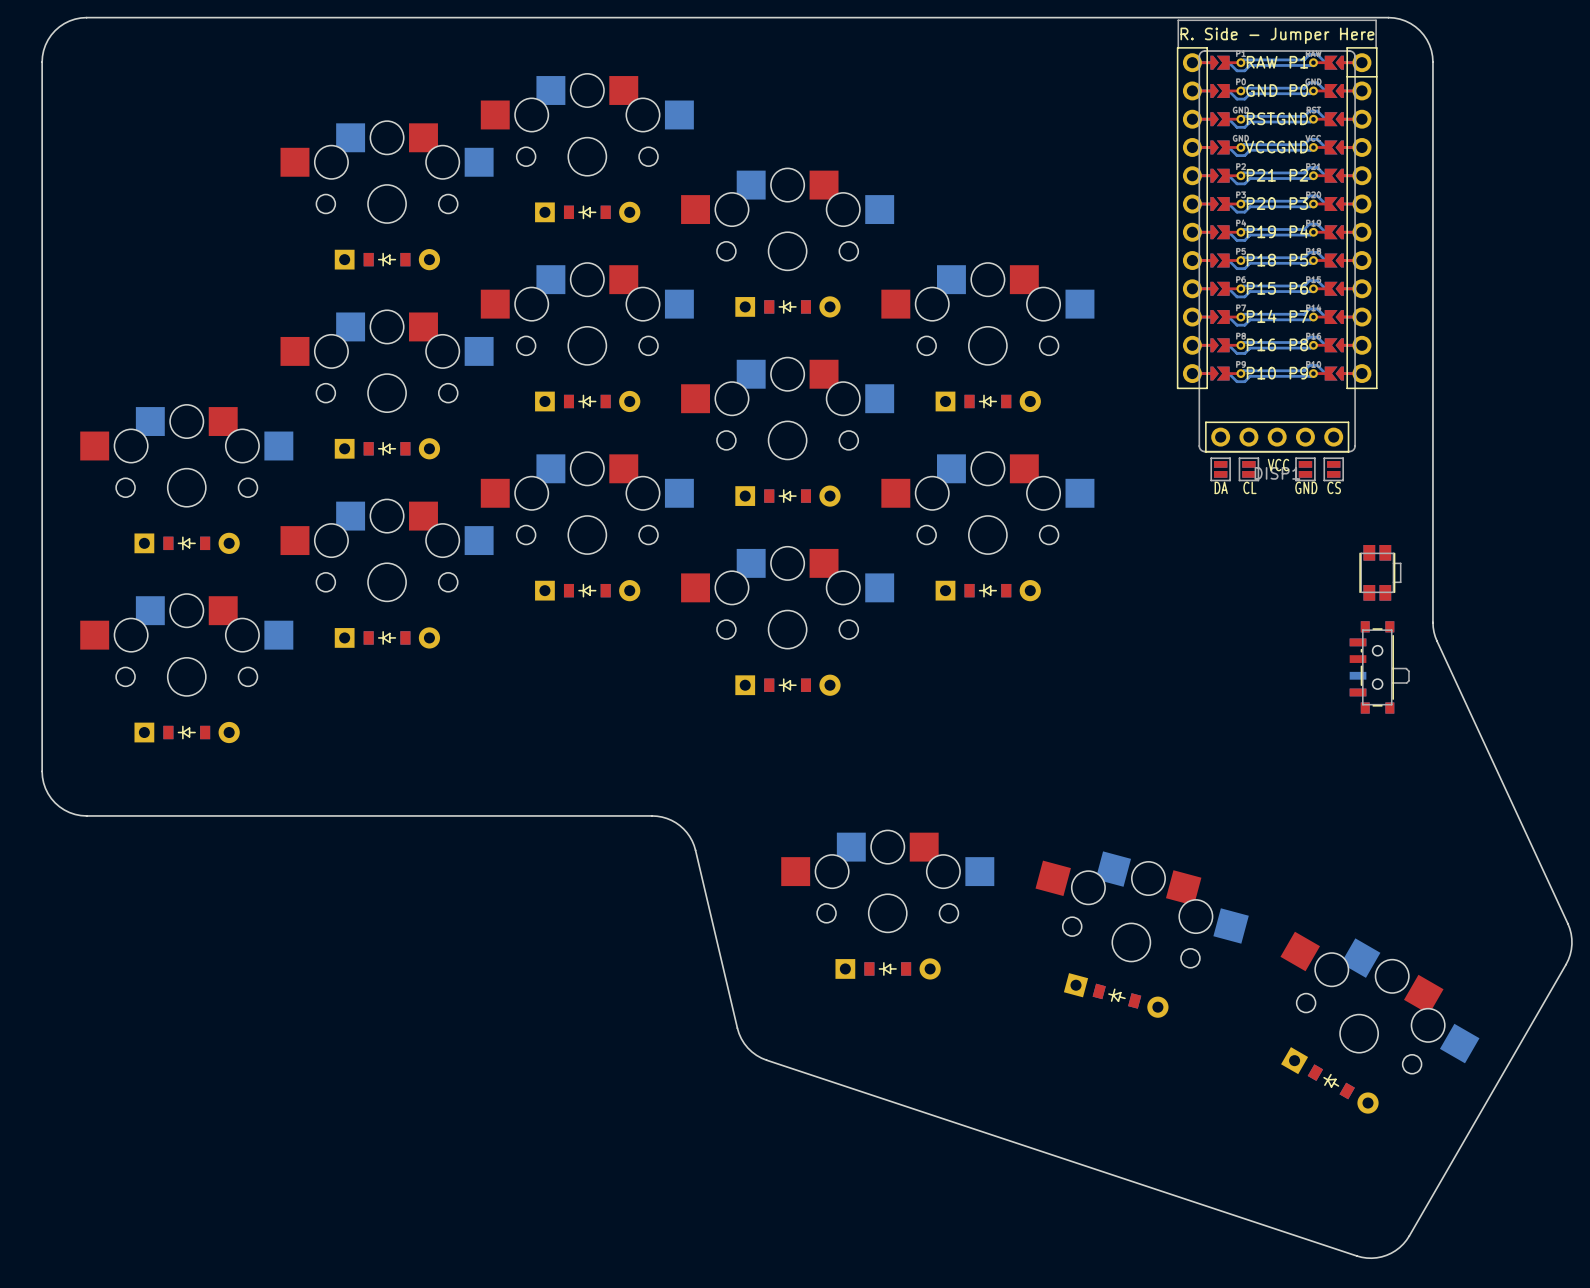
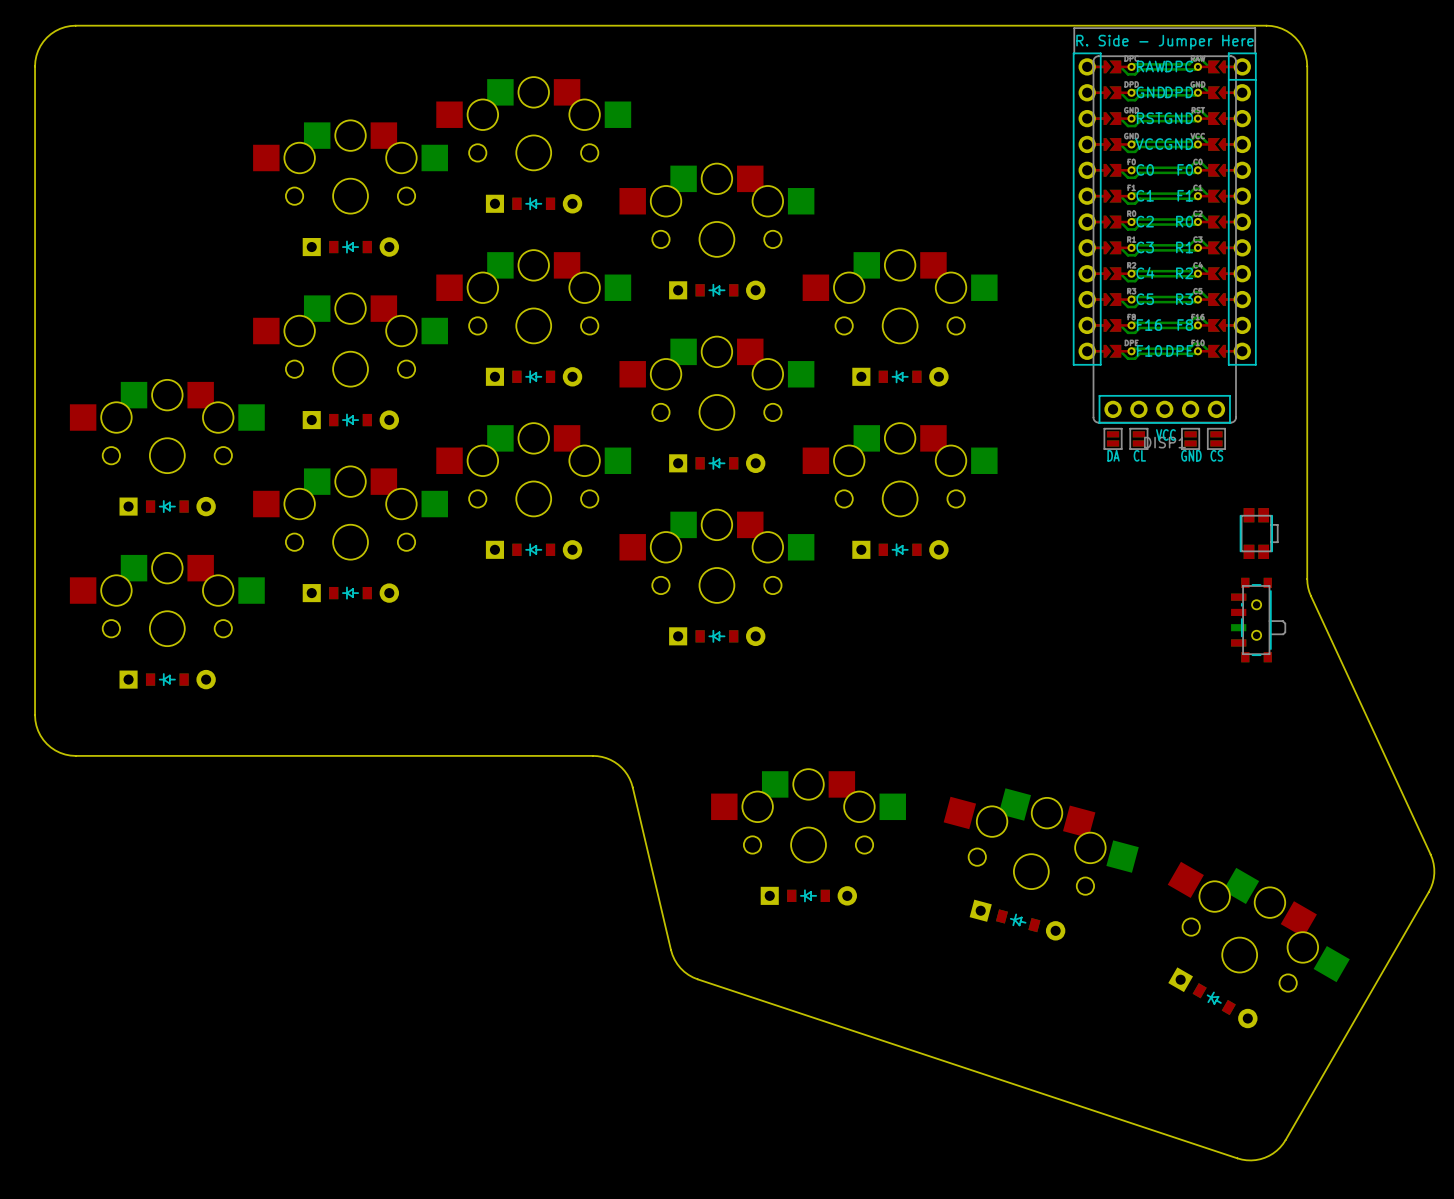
part footprint: [1176, 19, 1378, 390] -> [1073, 27, 1257, 366]

